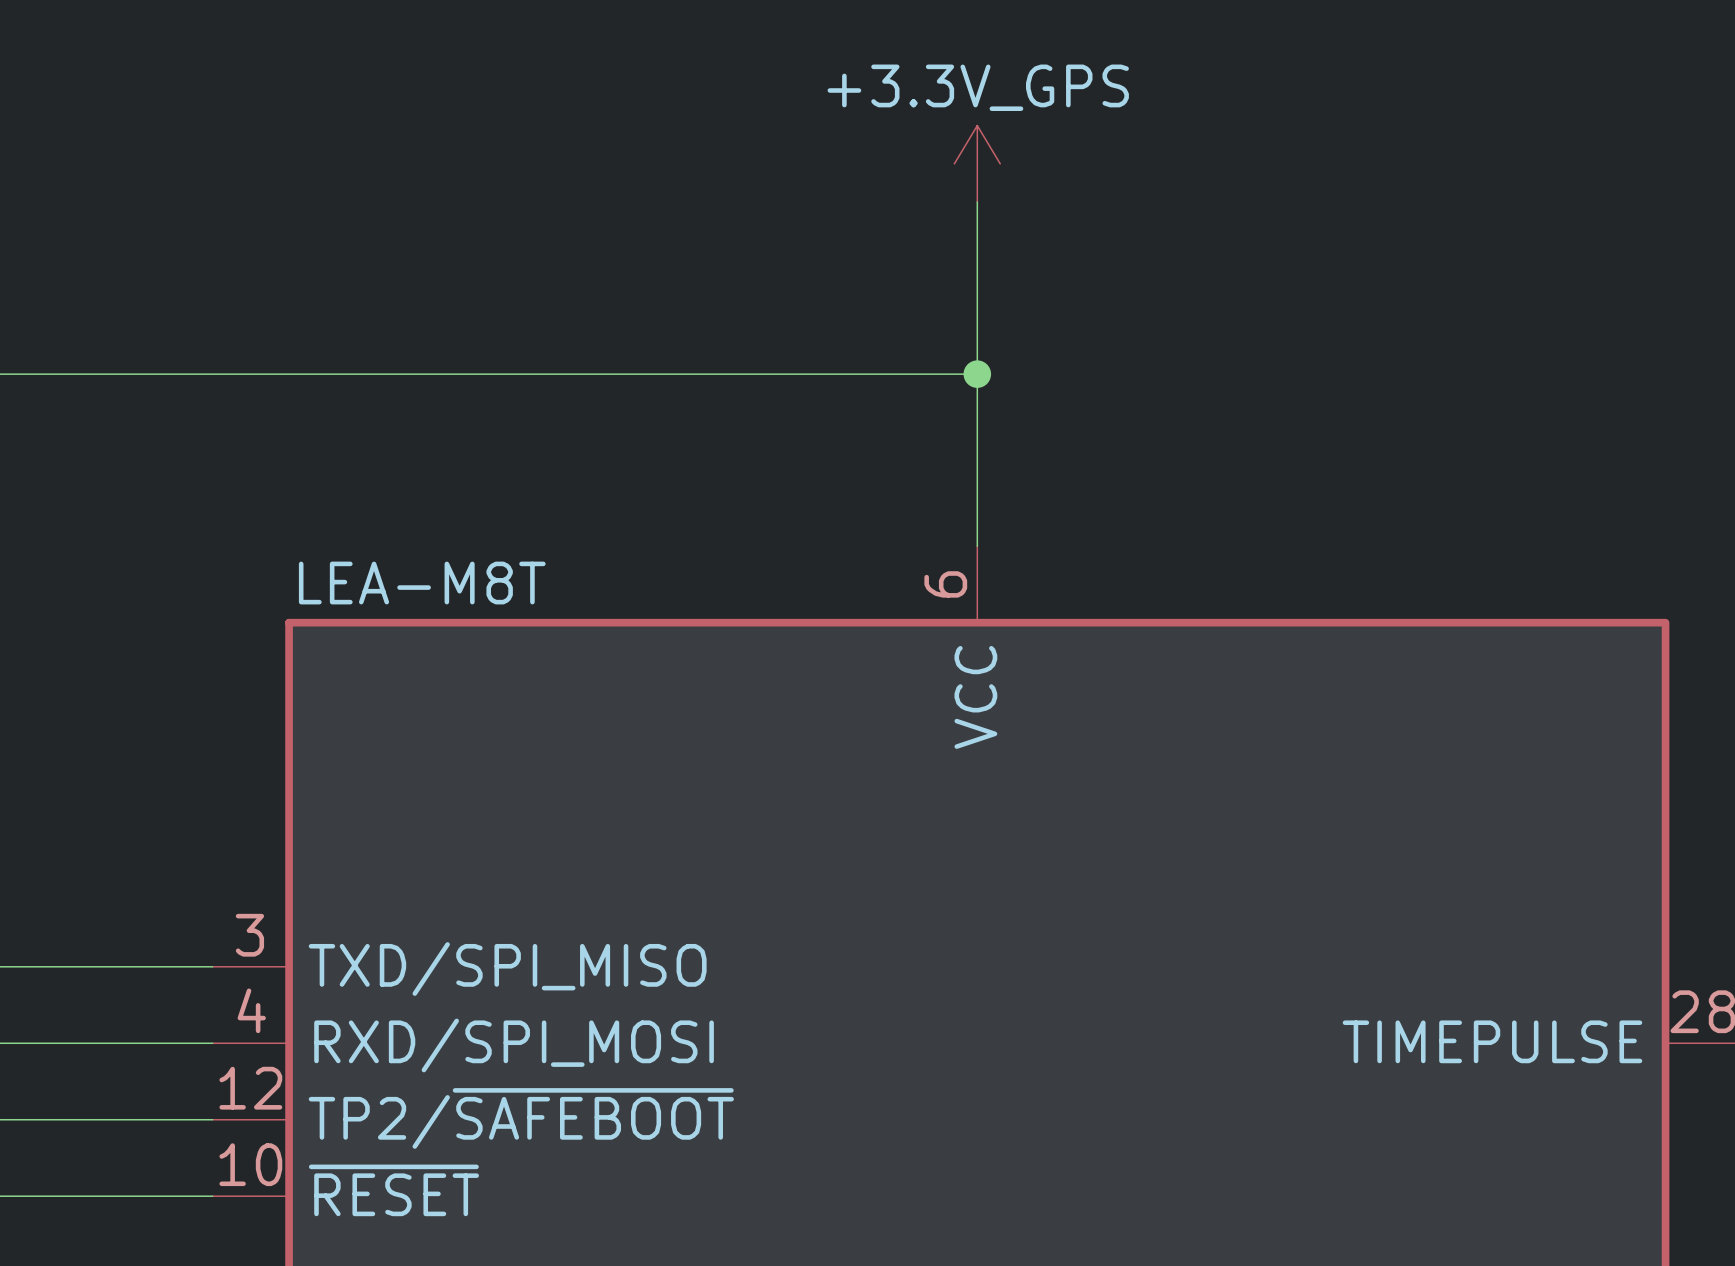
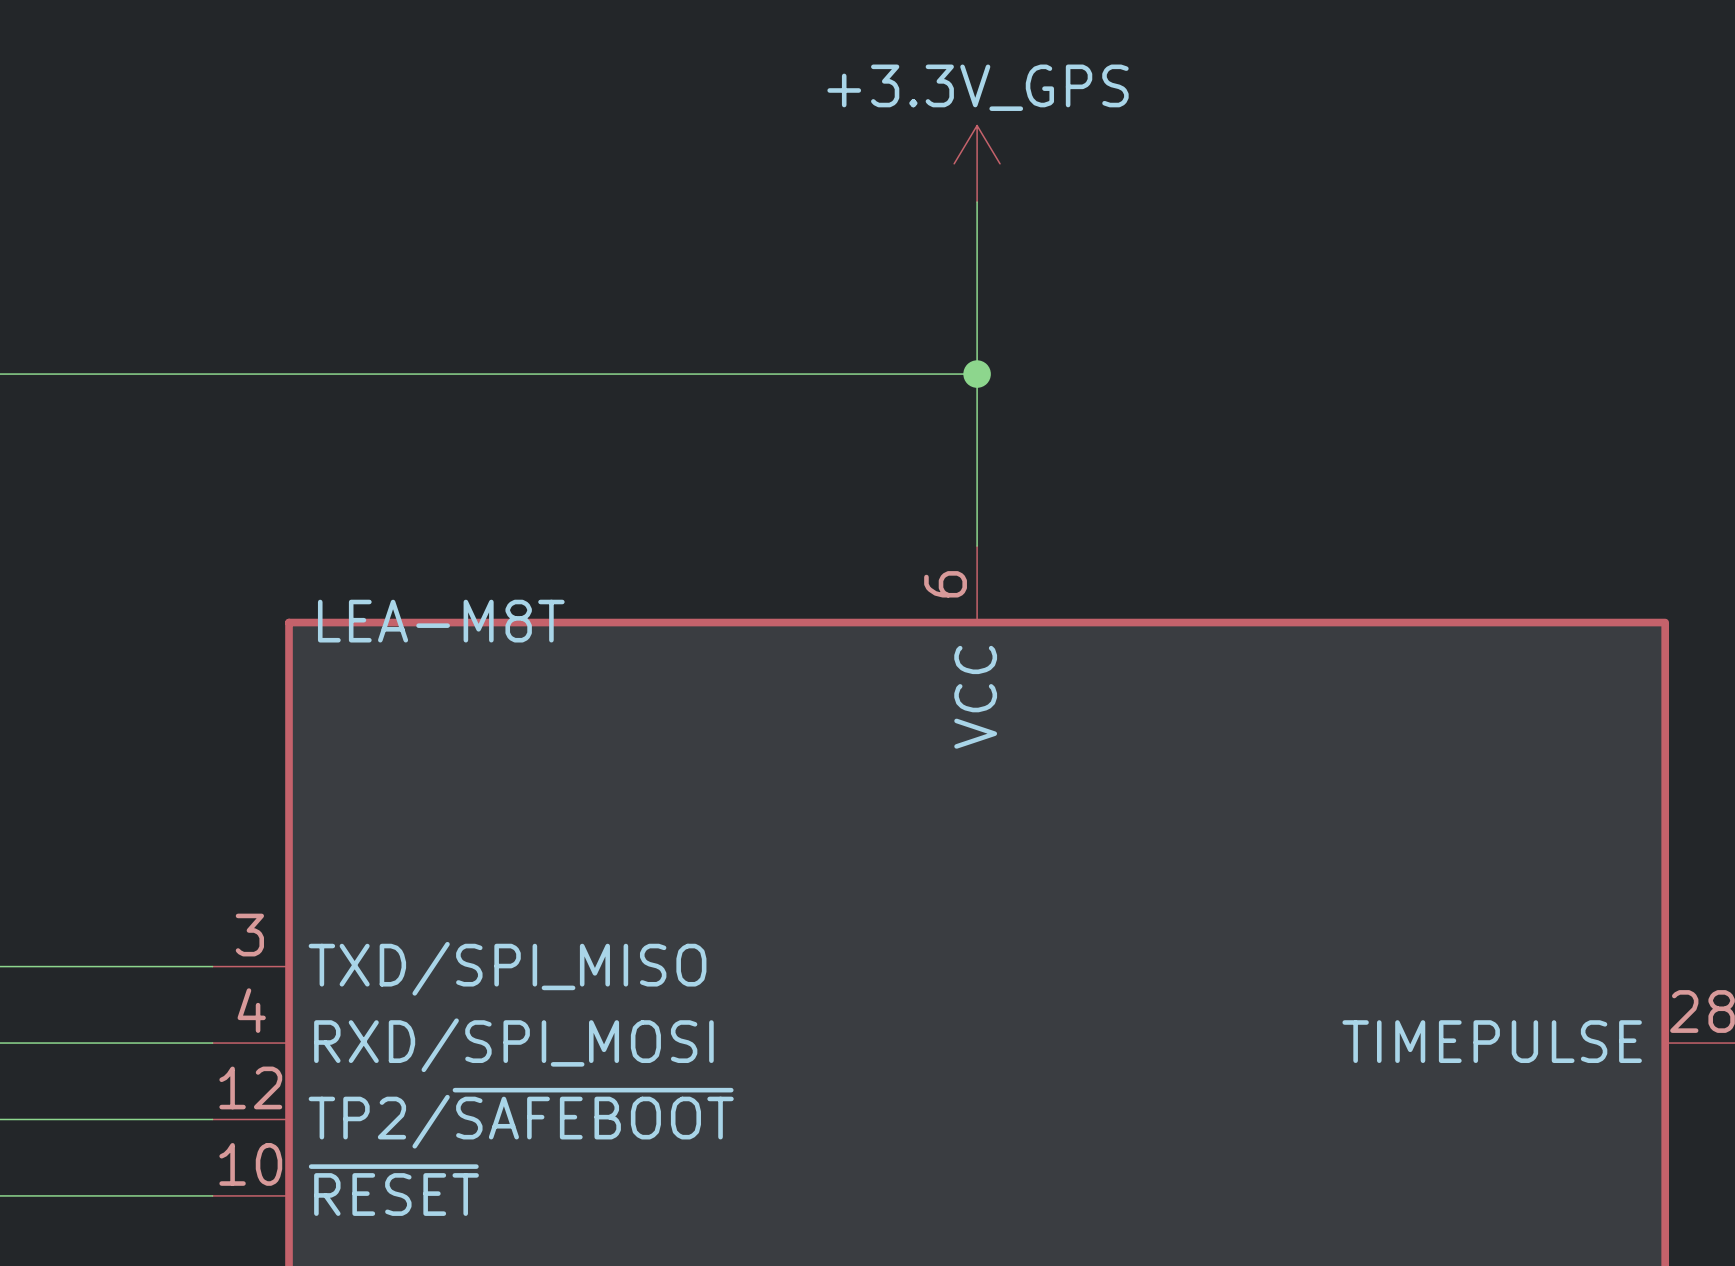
part value position: LEA-M8T (422, 583) -> LEA-M8T (441, 621)

